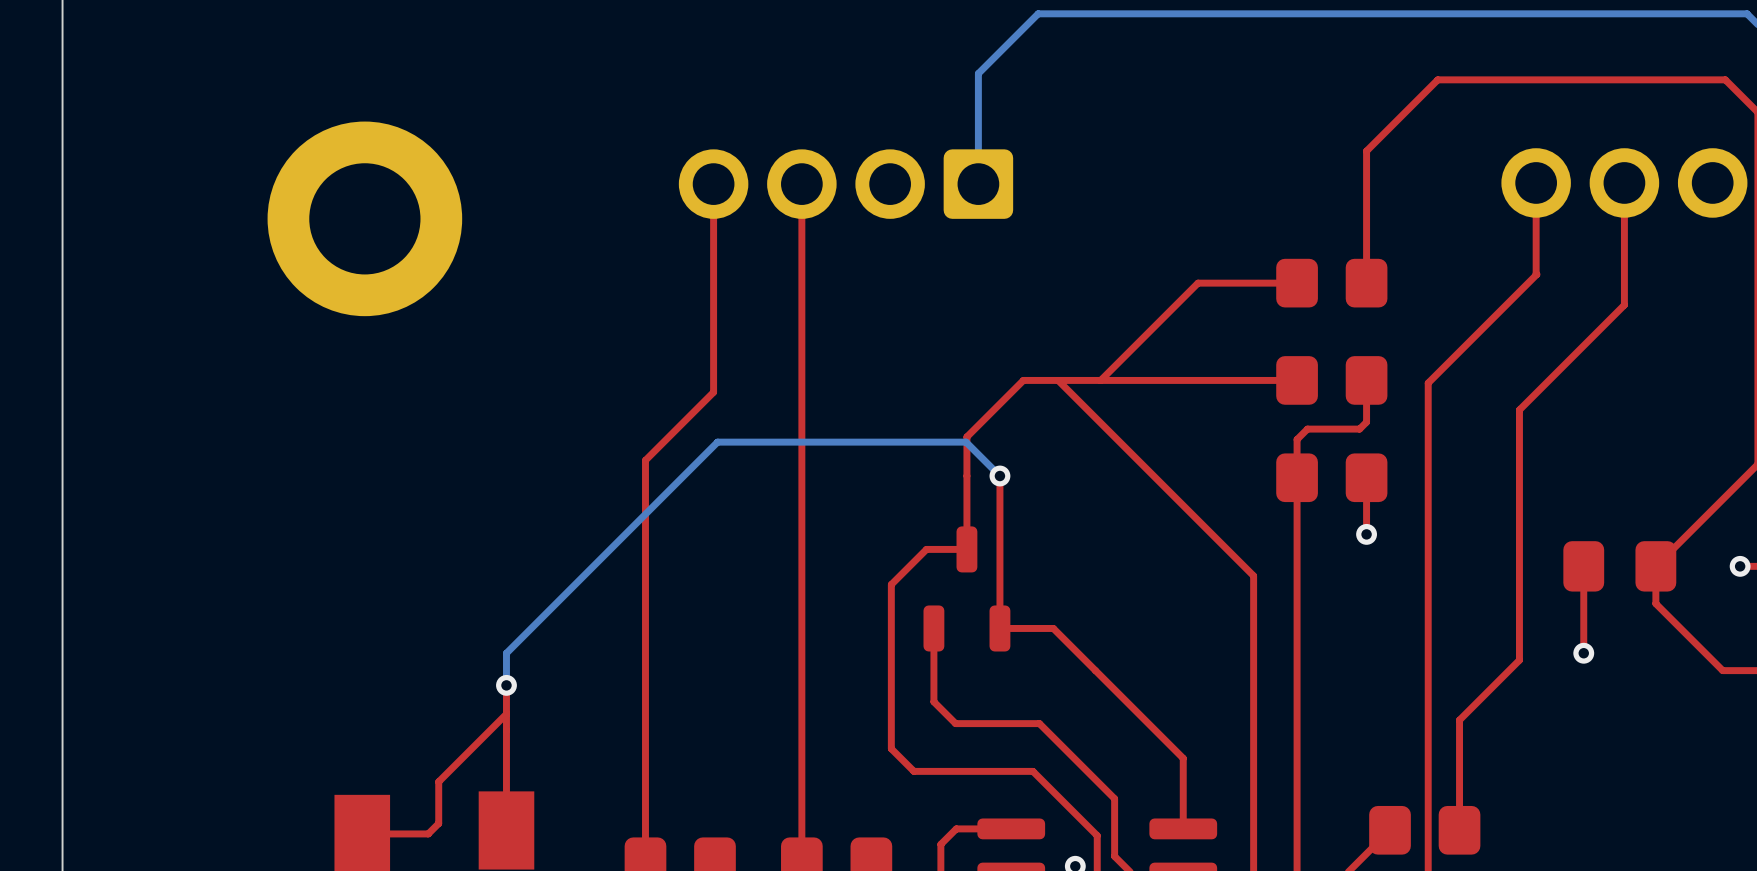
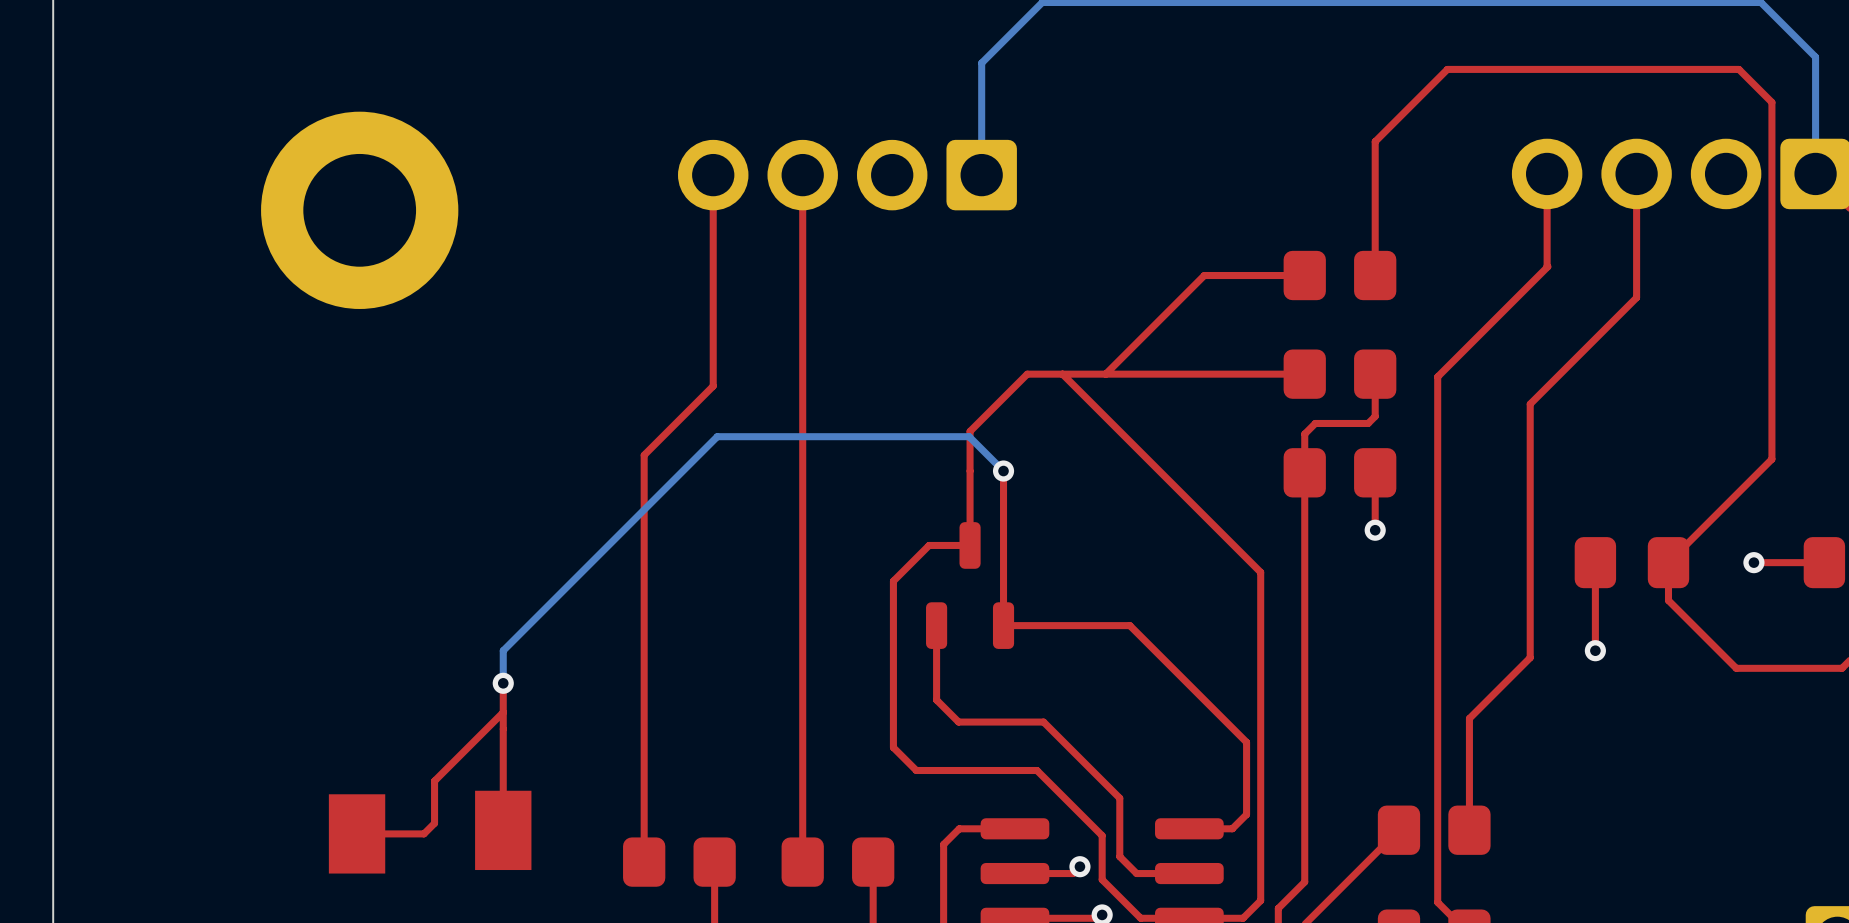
top track: (1053, 628) (1183, 758) (1183, 828) -> (1057, 625) (1129, 625) (1246, 742) (1246, 814) (1232, 828) (1189, 828)

